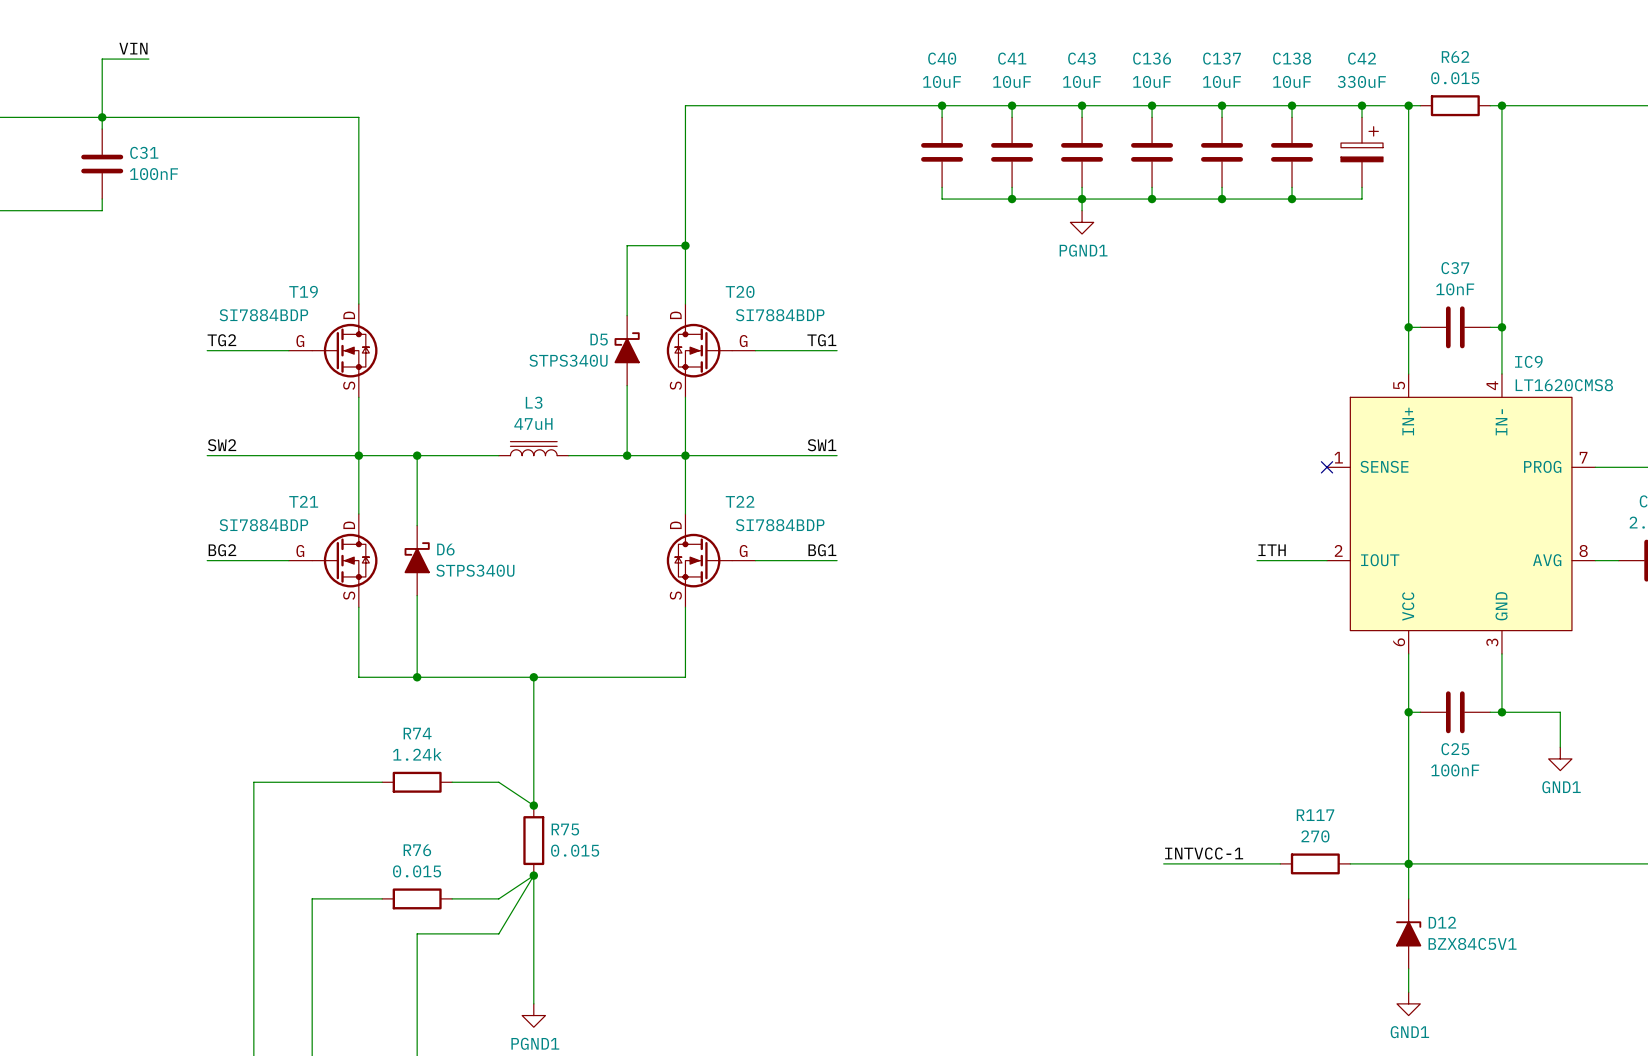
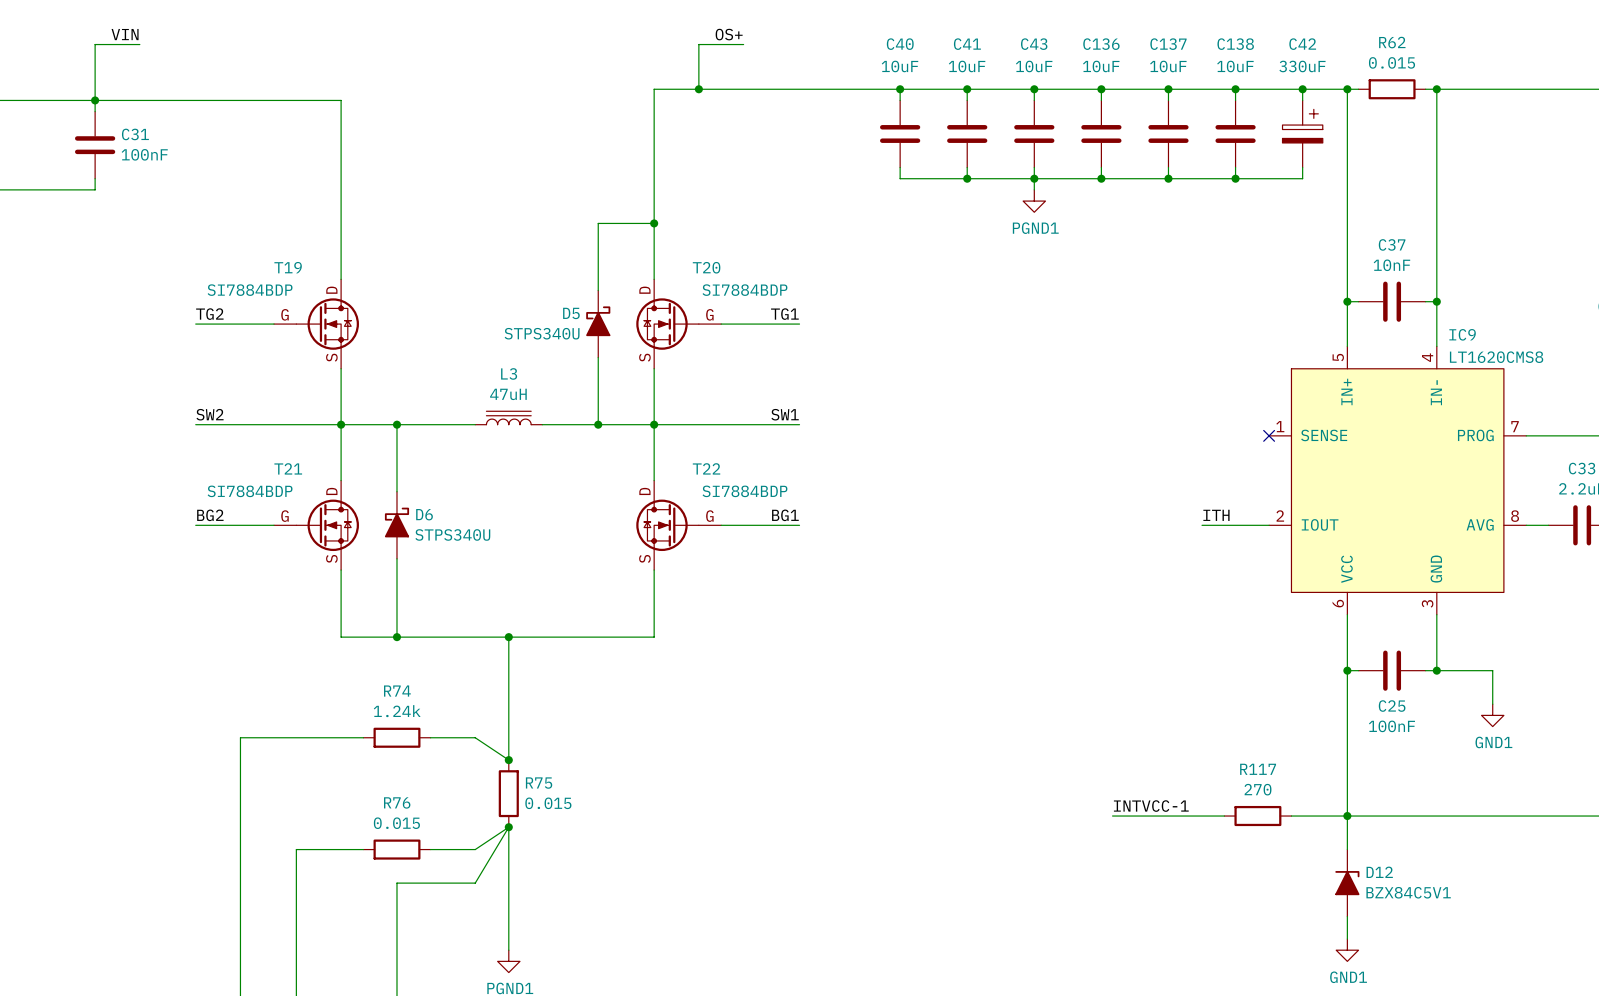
label: none -> OS+ (729, 34)
wire: none -> (743, 44) (698, 44) (698, 89)
junction: none -> (698, 89)

